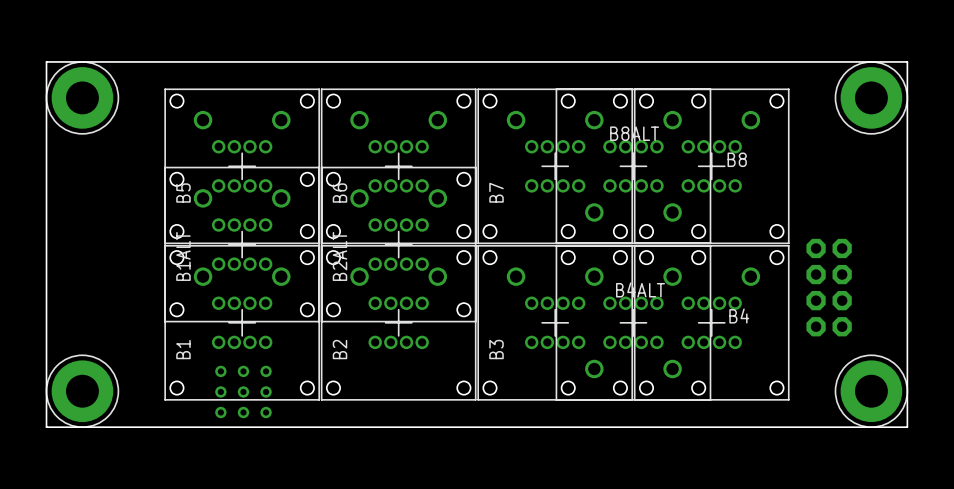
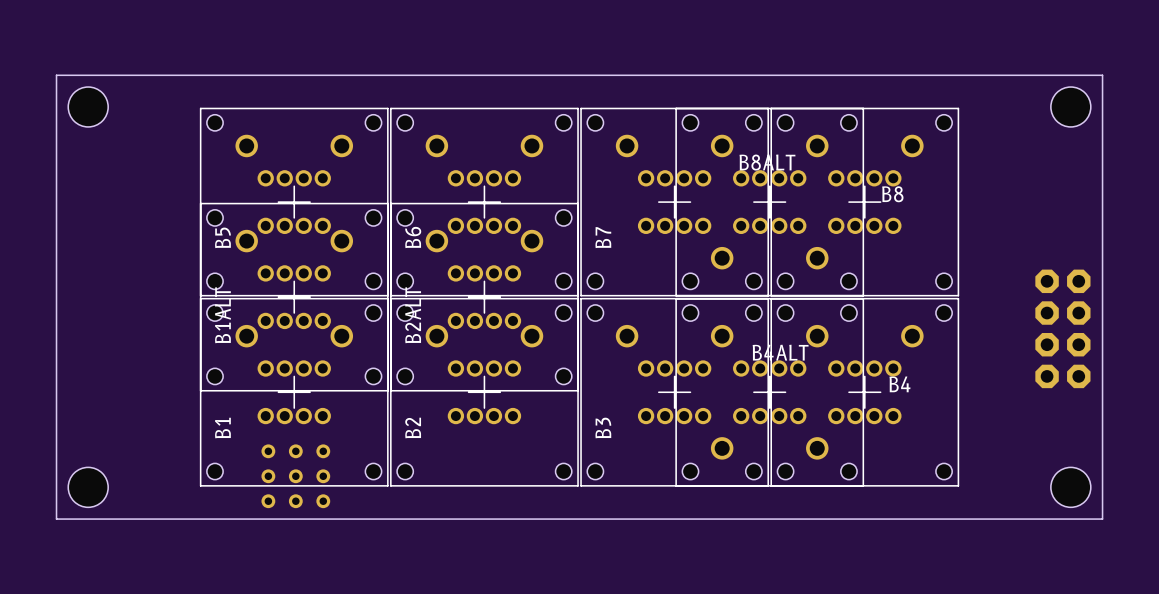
hole: none -> (88, 106)
hole: none -> (1070, 106)
part: (82, 97) -> none
part: (871, 97) -> none
part position: (829, 287) -> (1062, 328)
part: (82, 391) -> none
part: (871, 391) -> none
hole: none -> (88, 487)
hole: none -> (1070, 487)

